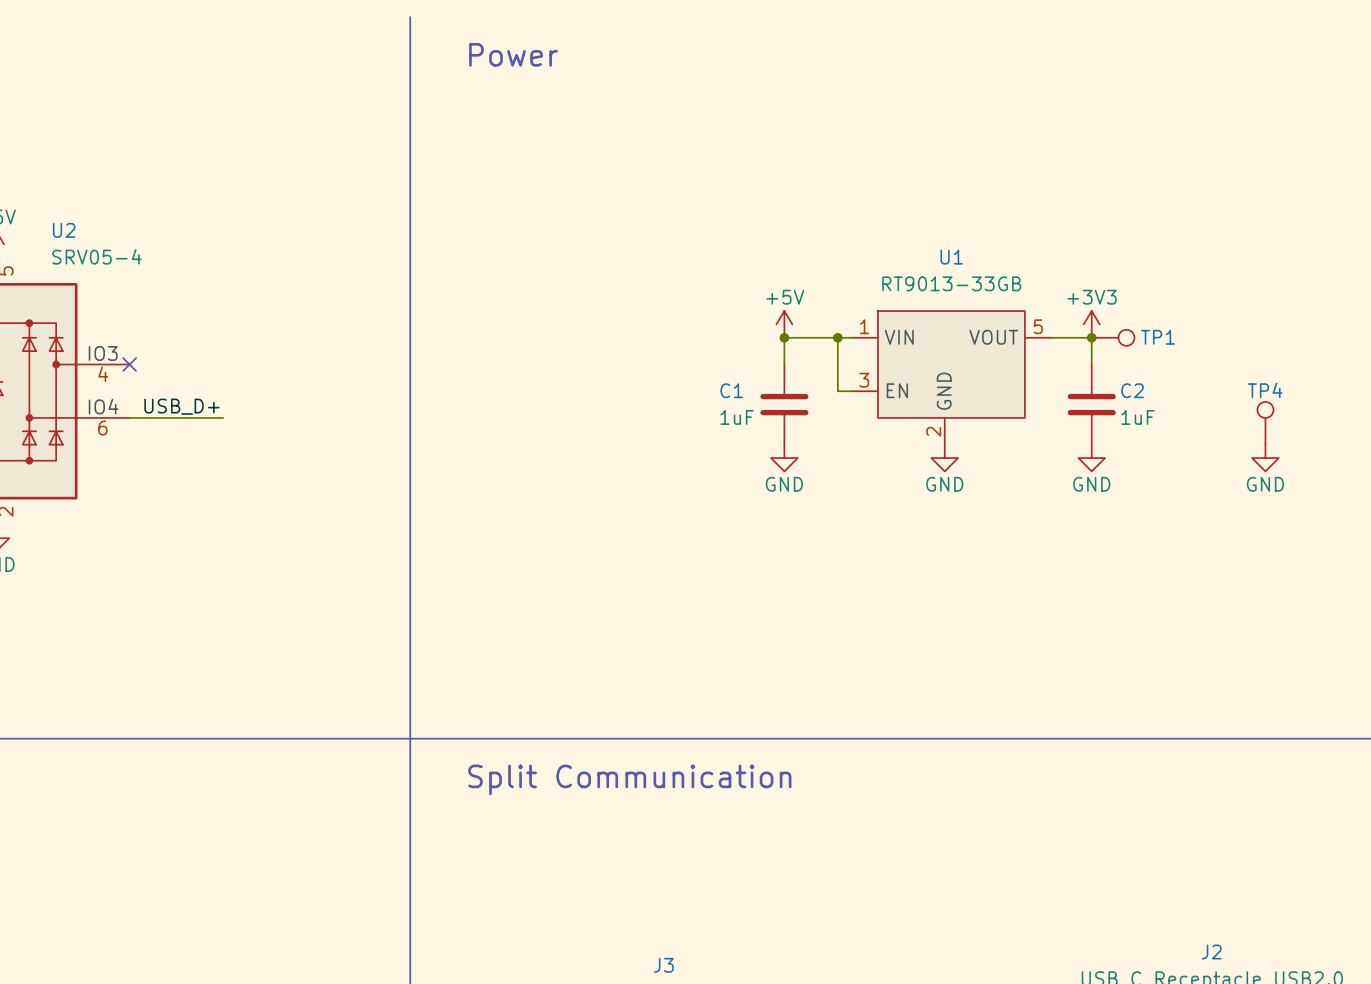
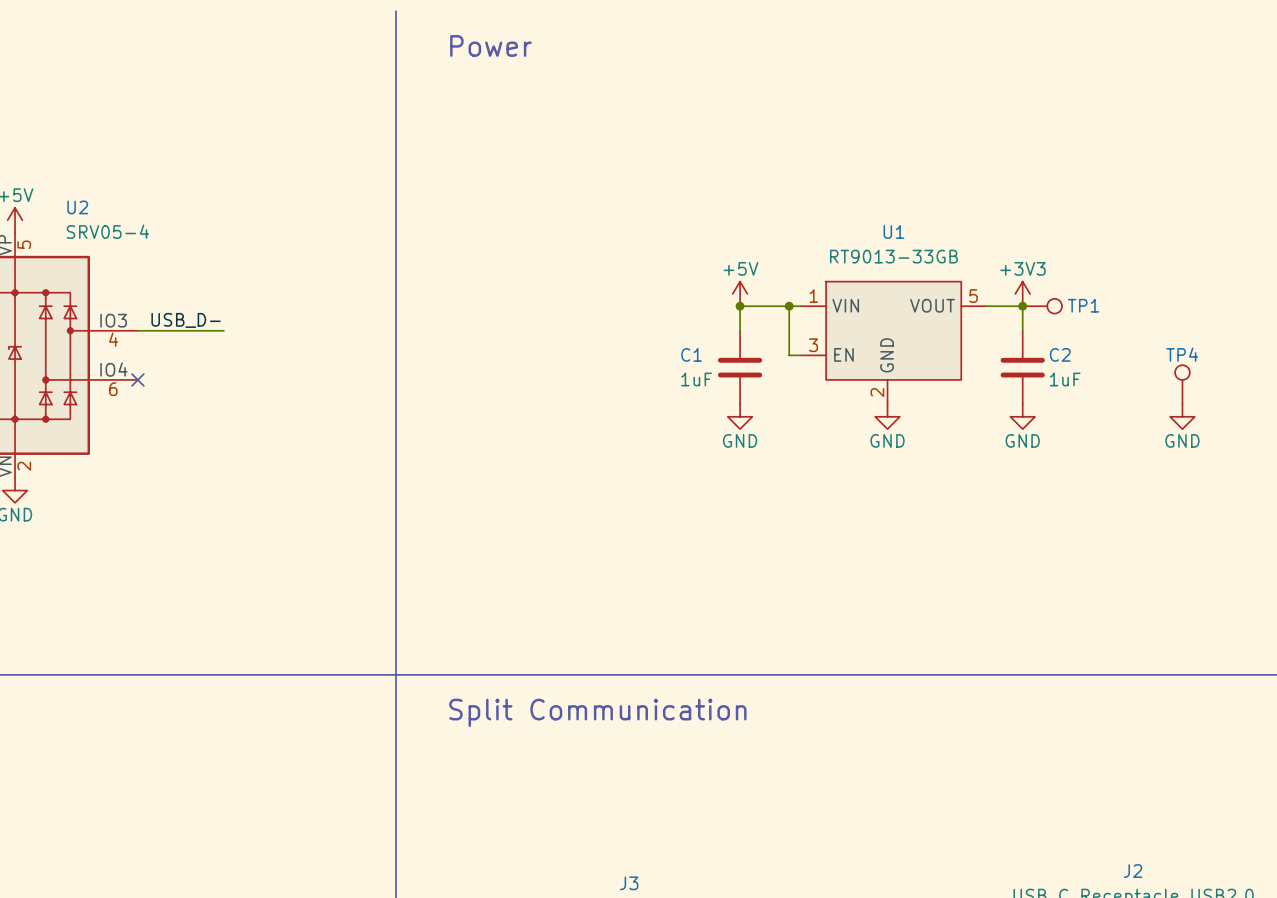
label: none -> USB_D- (186, 320)
no-connect mark position: (129, 364) -> (137, 379)
label: USB_D+ (182, 406) -> none
wire: (129, 417) (223, 417) -> (137, 330) (223, 330)

